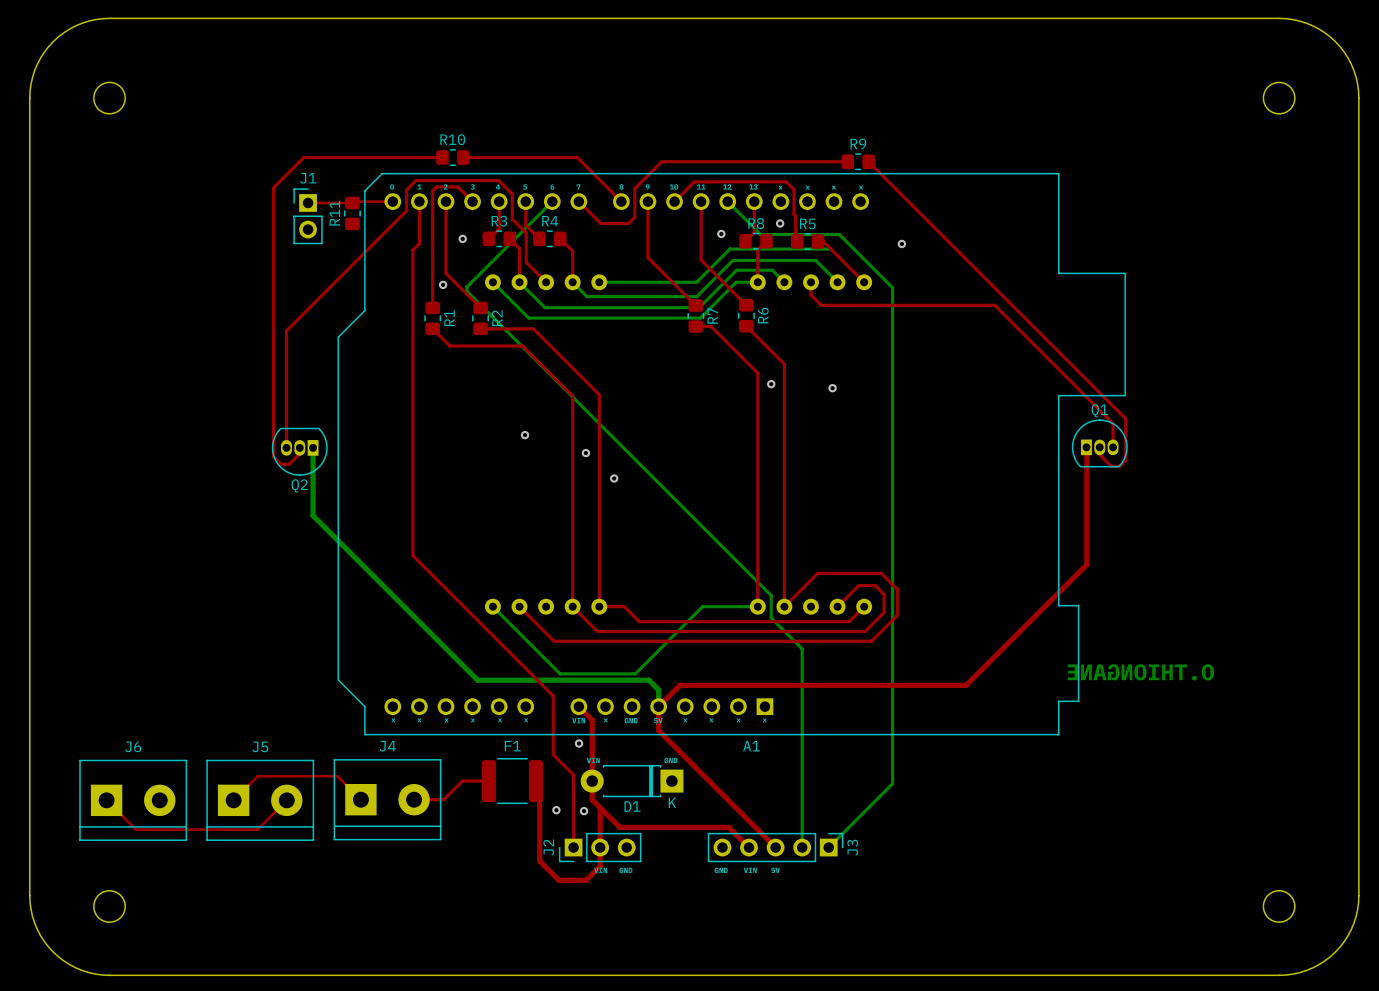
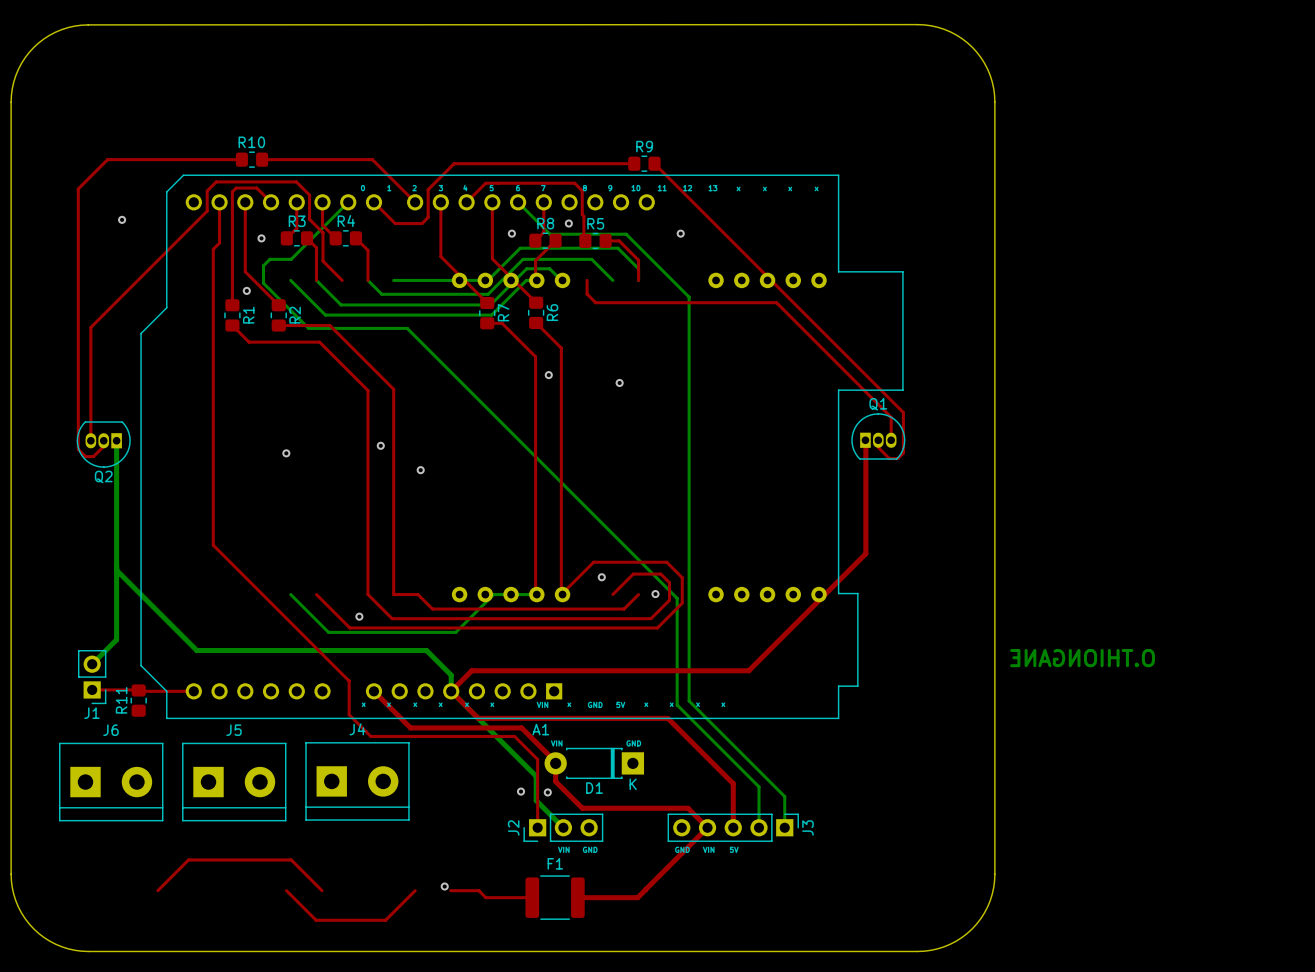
board edge: (109, 18) (1279, 18) (1299, 21) (1312, 25) (1324, 32) (1340, 46) (1354, 70) (1358, 98) (1358, 895) (1354, 922) (1344, 941) (1330, 956) (1312, 967) (1292, 974) (966, 975) -> (88, 24) (917, 24) (931, 25) (950, 31) (961, 38) (976, 52) (990, 75) (994, 101) (994, 880) (987, 906) (972, 928) (950, 944) (937, 948) (917, 951)
round board edge: [93, 81, 126, 115] -> none
round board edge: [1262, 81, 1296, 115] -> none
top track: none -> (241, 159) (107, 159) (78, 188) (78, 449) (85, 456) (93, 456) (103, 446) (103, 440)
top track: (303, 157) (273, 187) (273, 456) (280, 464) (289, 464) (299, 453) (299, 447) -> (276, 159) (262, 159)
top track: (402, 157) (442, 157) -> (372, 159) (415, 202)
R10 position: (452, 157) -> (252, 159)
top track: (463, 157) (577, 157) (621, 201) -> none
top track: (661, 161) (634, 188) (634, 217) (628, 223) (600, 223) (578, 201) -> (622, 163) (454, 163) (428, 189) (428, 217) (422, 223) (395, 223) (373, 202)
top track: (673, 161) (847, 161) -> none
R9 position: (858, 161) -> (644, 163)
top track: (868, 161) (1125, 418) (1125, 460) (1119, 466) (1111, 466) (1099, 454) (1099, 447) -> (654, 163) (903, 412) (903, 453) (897, 458) (889, 458) (878, 447) (878, 440)
top track: (419, 201) (419, 243) (412, 250) (412, 555) (553, 696) (553, 754) (573, 777) -> (219, 202) (219, 243) (213, 249) (213, 545) (349, 681) (349, 714) (370, 736) (514, 736) (537, 759)
top track: (445, 201) (445, 273) (480, 307) -> (245, 202) (245, 271) (278, 305)
top track: (472, 201) (457, 186) (436, 186) (432, 190) (432, 307) -> (271, 202) (256, 188) (236, 188) (232, 191) (232, 305)
top track: (499, 201) (499, 228) (488, 238) -> (296, 202) (296, 228) (286, 238)
top track: (525, 201) (525, 225) (539, 238) -> (322, 202) (322, 225) (335, 238)
bottom track: (552, 201) (466, 287) (466, 291) (771, 595) (771, 617) (802, 648) (802, 805) -> (348, 202) (291, 259) (269, 259) (263, 265) (263, 283) (308, 328) (407, 328) (677, 598) (677, 705) (759, 786)
top track: (647, 201) (647, 257) (695, 305) -> (440, 202) (440, 256) (487, 303)
top track: (674, 201) (694, 181) (786, 181) (793, 189) (793, 214) (797, 241) -> (466, 202) (485, 183) (574, 183) (582, 190) (585, 240)
top track: (701, 201) (701, 260) (746, 305) -> (492, 202) (492, 258) (536, 302)
bottom track: (727, 201) (760, 234) (839, 234) (892, 287) (892, 783) (828, 847) -> (518, 202) (549, 234) (626, 234) (689, 297) (689, 700) (784, 796) (784, 827)
top track: (754, 201) (754, 232) (745, 241) -> (543, 202) (543, 232) (535, 240)
top track: (308, 202) (392, 201) (391, 203) -> none
R11 position: (352, 213) -> (138, 700)
J1 rotation: 0° (308, 216) -> 180° (92, 677)
J1 position: (308, 216) -> (92, 677)
via: none -> (122, 219)
via: none -> (568, 223)
via: (780, 223) -> none
via: none -> (511, 233)
via: none -> (261, 238)
via: (462, 238) -> none
R3 position: (499, 238) -> (296, 238)
top track: (509, 238) (519, 248) (519, 282) -> (307, 238) (316, 247) (316, 280)
R4 position: (549, 238) -> (345, 238)
top track: (560, 238) (572, 251) (572, 282) -> (355, 238) (367, 250) (367, 280)
top track: none -> (555, 240) (535, 260) (535, 280)
top track: none -> (605, 240) (619, 240) (638, 260) (638, 280)
R8 position: (755, 241) -> (545, 240)
top track: (766, 241) (757, 249) (757, 282) -> none
R5 position: (807, 241) -> (595, 240)
top track: (818, 241) (823, 241) (864, 282) -> none
via: (901, 243) -> none
bottom track: none -> (290, 280) (325, 315) (491, 315) (526, 280) (535, 280)
bottom track: none -> (316, 280) (341, 304) (490, 304) (526, 268) (549, 268) (561, 280)
bottom track: none -> (367, 280) (381, 294) (488, 294) (523, 259) (591, 259) (612, 280)
bottom track: none -> (393, 280) (488, 280) (520, 248) (617, 248) (638, 268) (638, 280)
bottom track: (492, 282) (528, 318) (700, 318) (736, 282) (757, 282) -> none
bottom track: (519, 282) (544, 307) (699, 307) (736, 270) (772, 270) (784, 282) -> none
top track: (546, 282) (526, 262) (526, 233) (512, 219) (512, 194) (498, 180) (415, 180) (406, 189) (406, 210) (286, 330) (286, 447) -> (342, 280) (323, 261) (323, 232) (309, 219) (309, 195) (296, 181) (216, 181) (207, 190) (207, 211) (90, 327) (90, 440)
bottom track: (572, 282) (587, 296) (696, 296) (732, 260) (815, 260) (837, 282) -> none
bottom track: (599, 282) (696, 282) (729, 249) (830, 249) (864, 282) -> none
top track: none -> (587, 280) (587, 294) (595, 302) (776, 302) (891, 417) (891, 440)
top track: (810, 282) (810, 295) (821, 305) (994, 305) (1113, 423) (1113, 447) -> none
via: (443, 284) -> none
via: none -> (246, 290)
R6 position: (746, 315) -> (536, 312)
R7 position: (695, 316) -> (487, 313)
R1 position: (432, 318) -> (232, 315)
R2 position: (480, 318) -> (278, 315)
top track: none -> (487, 323) (502, 323) (535, 356) (535, 594)
top track: (695, 326) (711, 326) (757, 373) (757, 606) -> none
top track: (746, 326) (784, 364) (784, 606) (817, 573) (881, 573) (897, 589) (897, 615) (871, 641) (697, 641) -> (536, 322) (561, 348) (561, 594) (593, 562) (666, 562) (682, 577) (682, 603) (657, 627)
top track: (432, 328) (449, 346) (522, 346) (572, 395) (572, 606) (597, 631) -> (232, 325) (249, 342) (319, 342) (367, 390) (367, 594) (392, 618) (560, 618)
top track: (480, 328) (533, 328) (599, 394) (599, 606) (624, 606) (639, 621) -> (278, 325) (329, 325) (393, 389) (393, 594) (417, 594) (432, 609) (601, 609)
via: none -> (548, 375)
via: (771, 384) -> none
via: none -> (619, 382)
via: (832, 388) -> none
via: (525, 435) -> none
Q1 position: (1099, 443) -> (878, 436)
bottom track: none -> (116, 440) (116, 639) (92, 664)
bottom track: (313, 447) (313, 515) (477, 680) (648, 680) (658, 689) (658, 706) -> none
top track: (1086, 447) (1086, 564) (966, 685) (791, 685) -> (865, 440) (865, 553) (748, 670)
Q2 position: (299, 451) -> (103, 444)
via: none -> (380, 445)
via: (585, 453) -> none
A1 position: (731, 454) -> (521, 446)
via: none -> (286, 453)
via: none -> (420, 470)
via: (614, 478) -> none
bottom track: none -> (116, 570) (196, 650) (426, 650) (451, 675) (451, 691) (536, 776) (536, 800) (563, 827)
via: none -> (601, 577)
bottom track: none -> (290, 594) (328, 632) (455, 632) (493, 594) (535, 594)
bottom track: (492, 606) (560, 673) (635, 673) (702, 606) (757, 606) -> none
top track: (519, 606) (554, 641) -> (316, 594) (349, 627) (518, 627)
via: none -> (655, 594)
top track: (837, 606) (858, 585) (875, 585) (884, 594) (884, 612) (865, 631) (690, 631) -> (612, 594) (633, 574) (660, 574) (669, 582) (669, 600) (651, 618)
top track: (864, 606) (849, 621) (662, 621) -> (638, 594) (624, 609)
via: none -> (359, 616)
top track: (679, 685) (658, 706) (658, 730) (775, 847) -> (640, 670) (471, 670) (451, 691) (478, 718) (667, 718) (733, 783) (733, 827)
top track: none -> (92, 689) (193, 691)
top track: (578, 706) (592, 719) (592, 779) -> (373, 691) (410, 727) (521, 727) (555, 761)
via: (579, 743) -> none
top track: (488, 781) (462, 781) (443, 799) (414, 799) -> none
F1 position: (512, 781) -> (555, 897)
top track: (535, 781) (539, 784) (539, 861) (558, 880) (586, 880) (600, 866) (600, 807) -> none
top track: (360, 799) (337, 776) (257, 776) (233, 800) -> none
top track: (106, 800) (135, 829) (257, 829) (286, 800) -> none
top track: none -> (707, 827) (645, 889)
round board edge: [93, 890, 126, 923] -> none
round board edge: [1262, 890, 1296, 923] -> none
via: none -> (444, 886)
top track: none -> (645, 889) (637, 897) (577, 897)
top track: none -> (157, 890) (188, 859) (291, 859) (322, 890)
top track: none -> (286, 890) (316, 920) (385, 920) (415, 890)
top track: none -> (450, 890) (478, 890) (485, 897) (532, 897)

